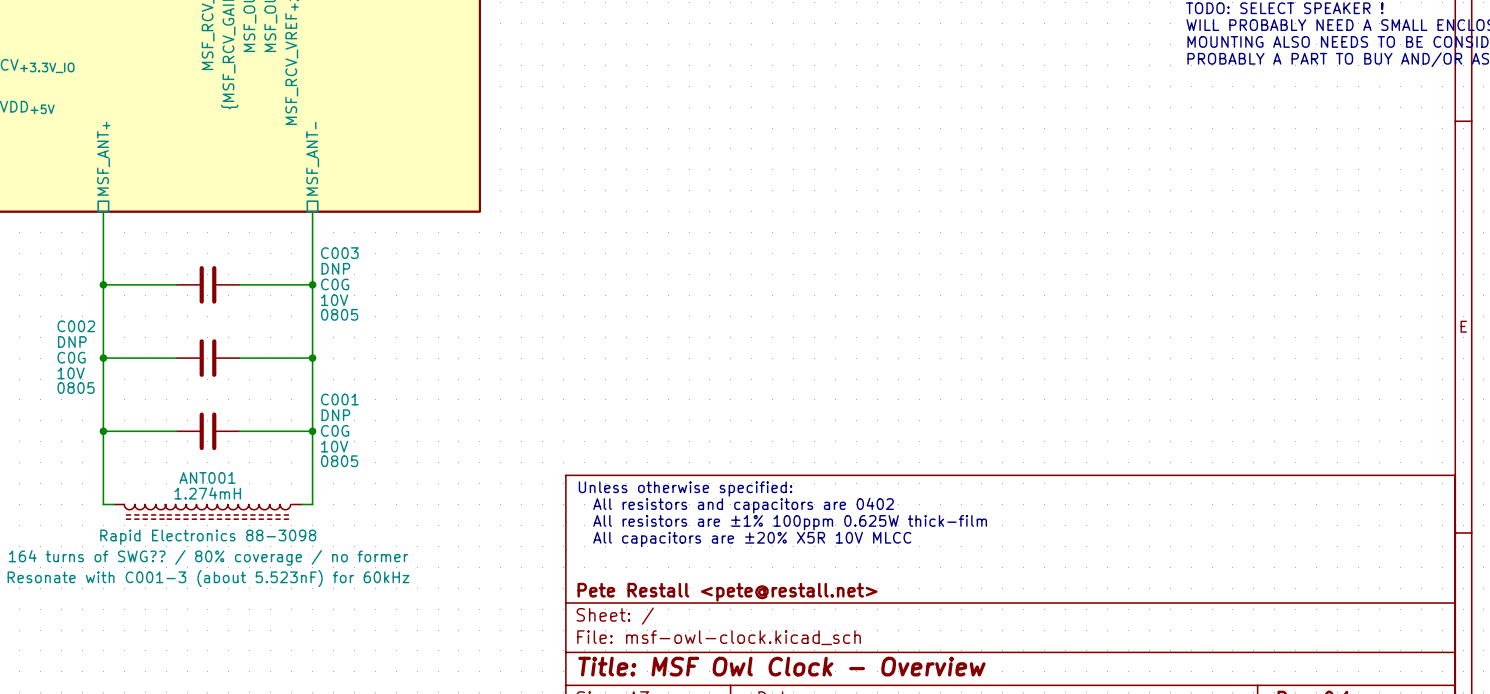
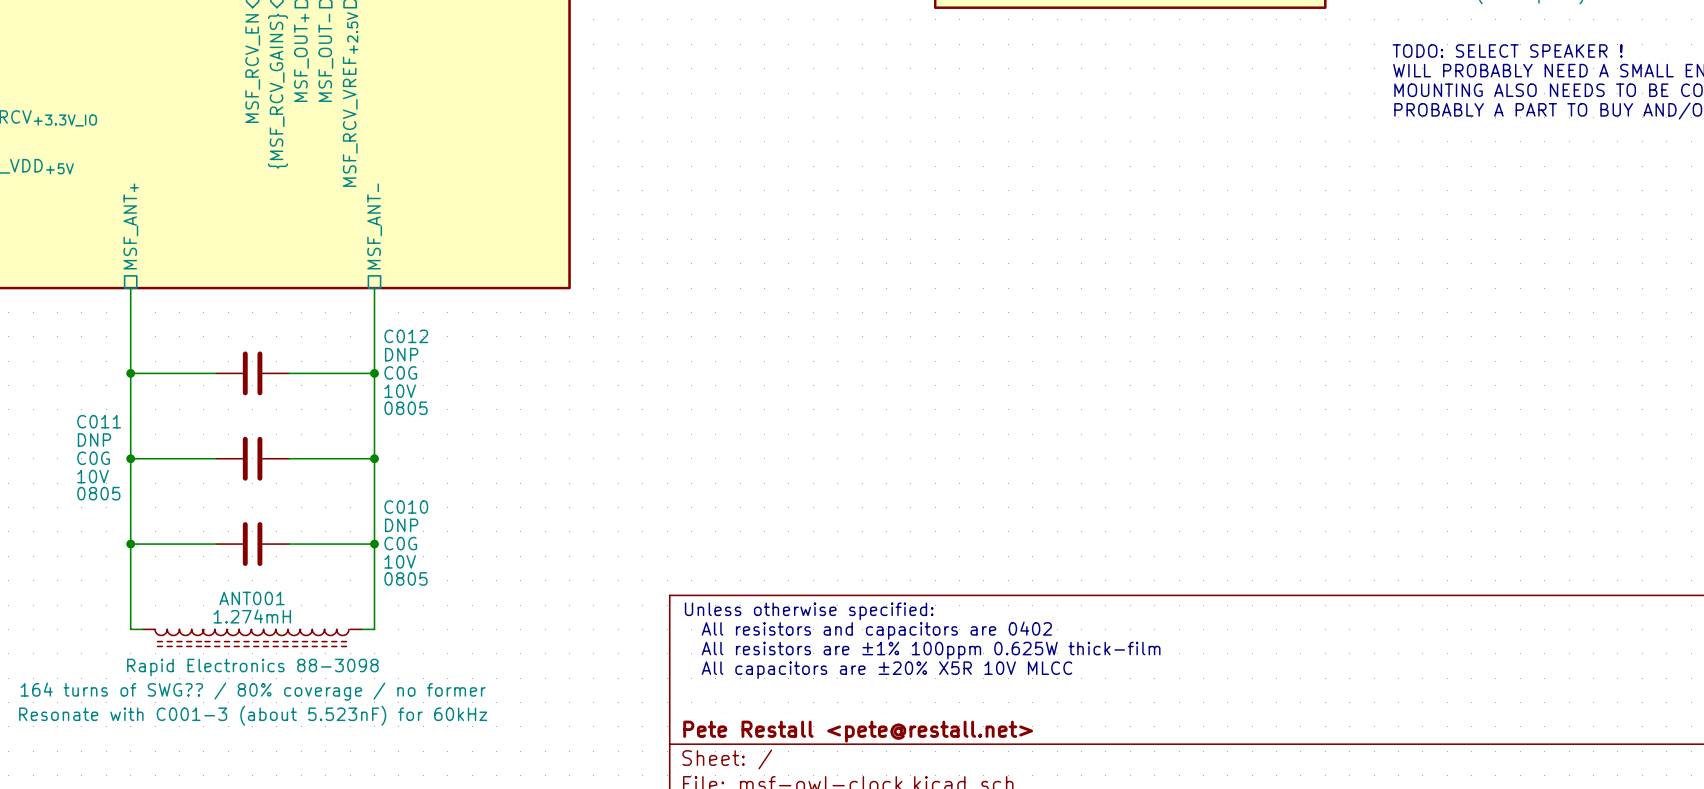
C003 name: C003 (339, 253) -> C012 (406, 336)
C002 name: C002 (76, 326) -> C011 (99, 421)
C001 name: C001 (339, 399) -> C010 (406, 507)

